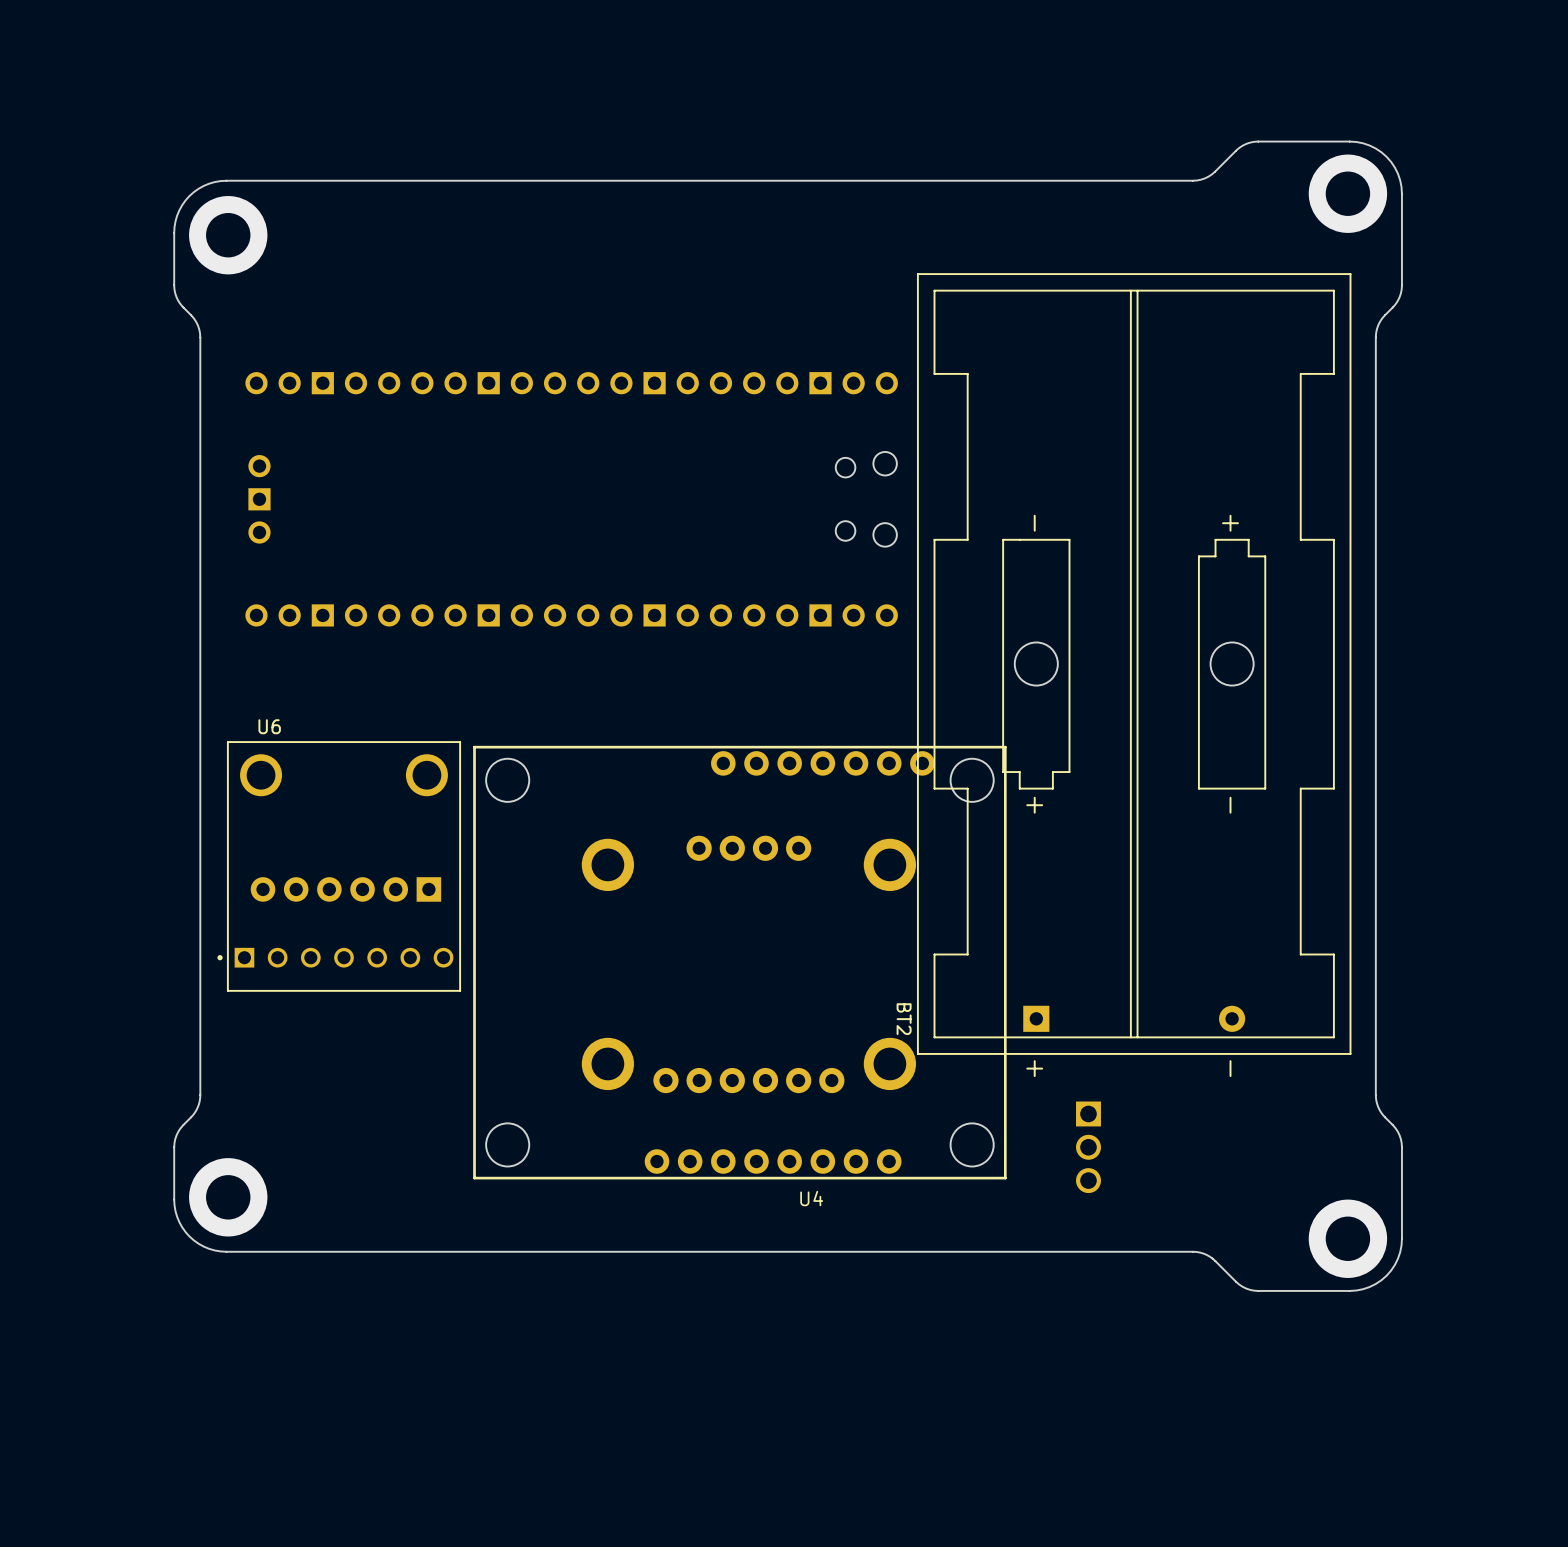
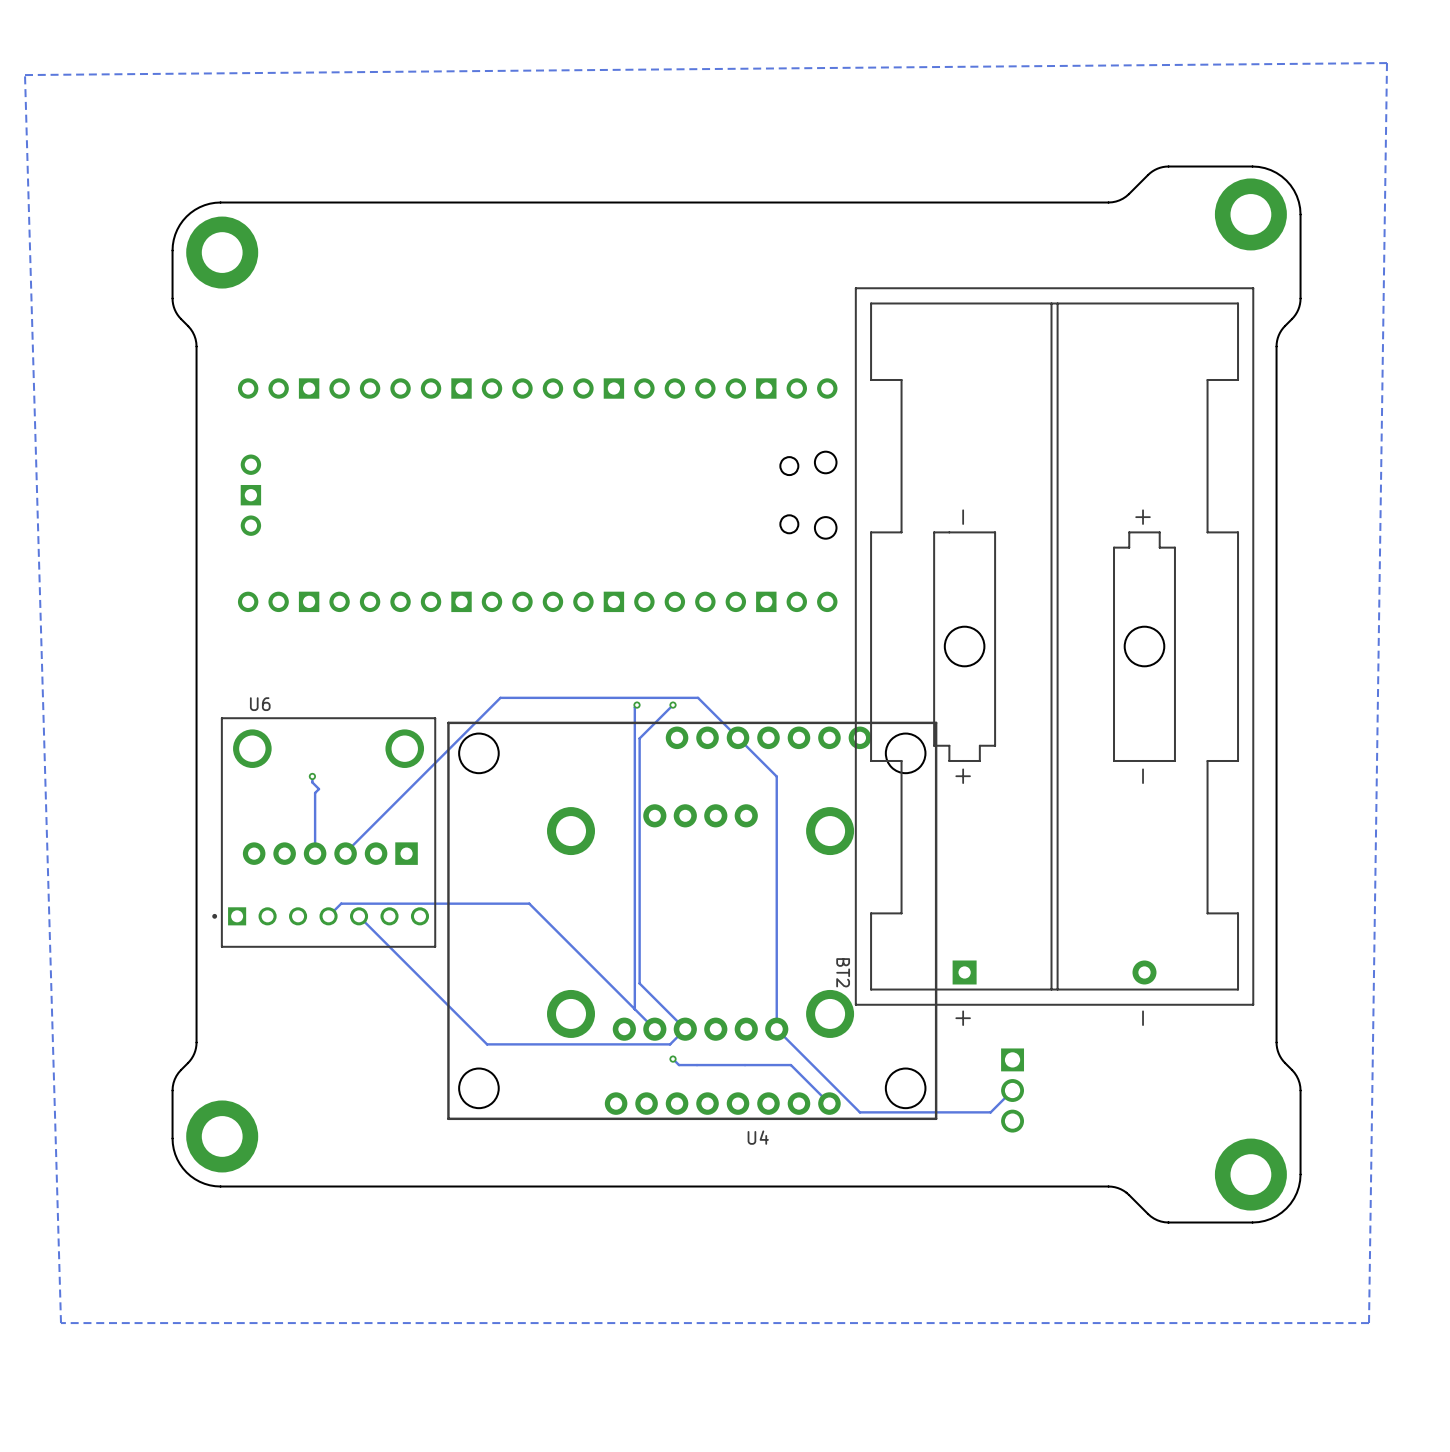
zone outline: none -> (1387, 63) (1369, 1323) (61, 1323) (25, 75) (1387, 63)
track: none -> (637, 705) (634, 707) (634, 1009)
via: none -> (637, 705)
track: none -> (673, 705) (639, 738) (639, 983) (685, 1029) (670, 1044) (487, 1044) (359, 916)
via: none -> (673, 705)
track: none -> (312, 776) (312, 782) (319, 789) (315, 792) (315, 853)
via: none -> (312, 776)
track: none -> (345, 853) (500, 697) (698, 697) (776, 776) (776, 1029) (859, 1112) (990, 1112) (1012, 1090)
track: none -> (328, 916) (341, 903) (529, 903) (654, 1029)
track: none -> (673, 1059) (679, 1065) (790, 1065) (829, 1103)
via: none -> (673, 1059)

